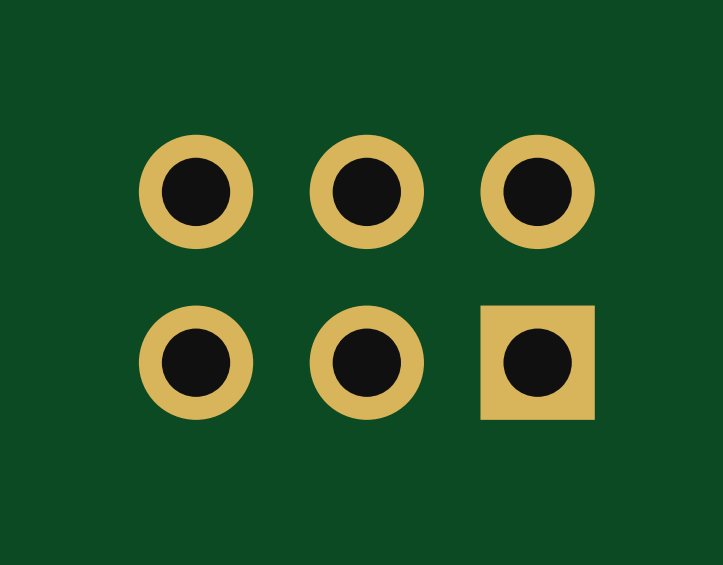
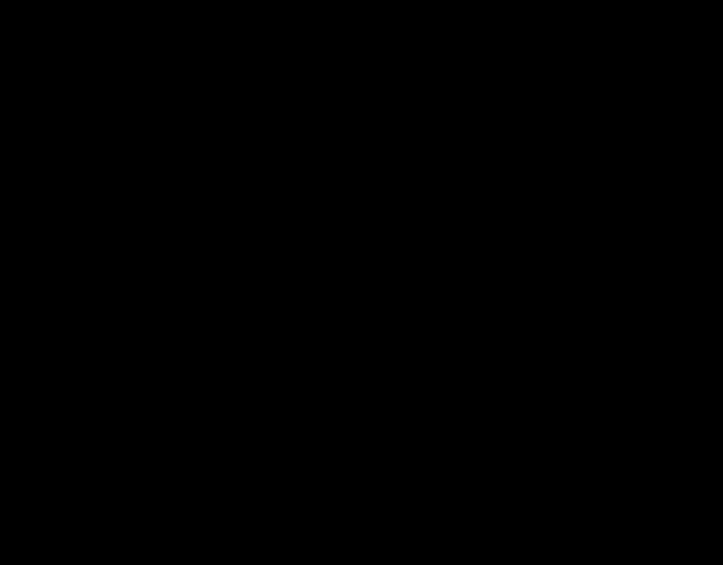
part: (366, 277) -> none

